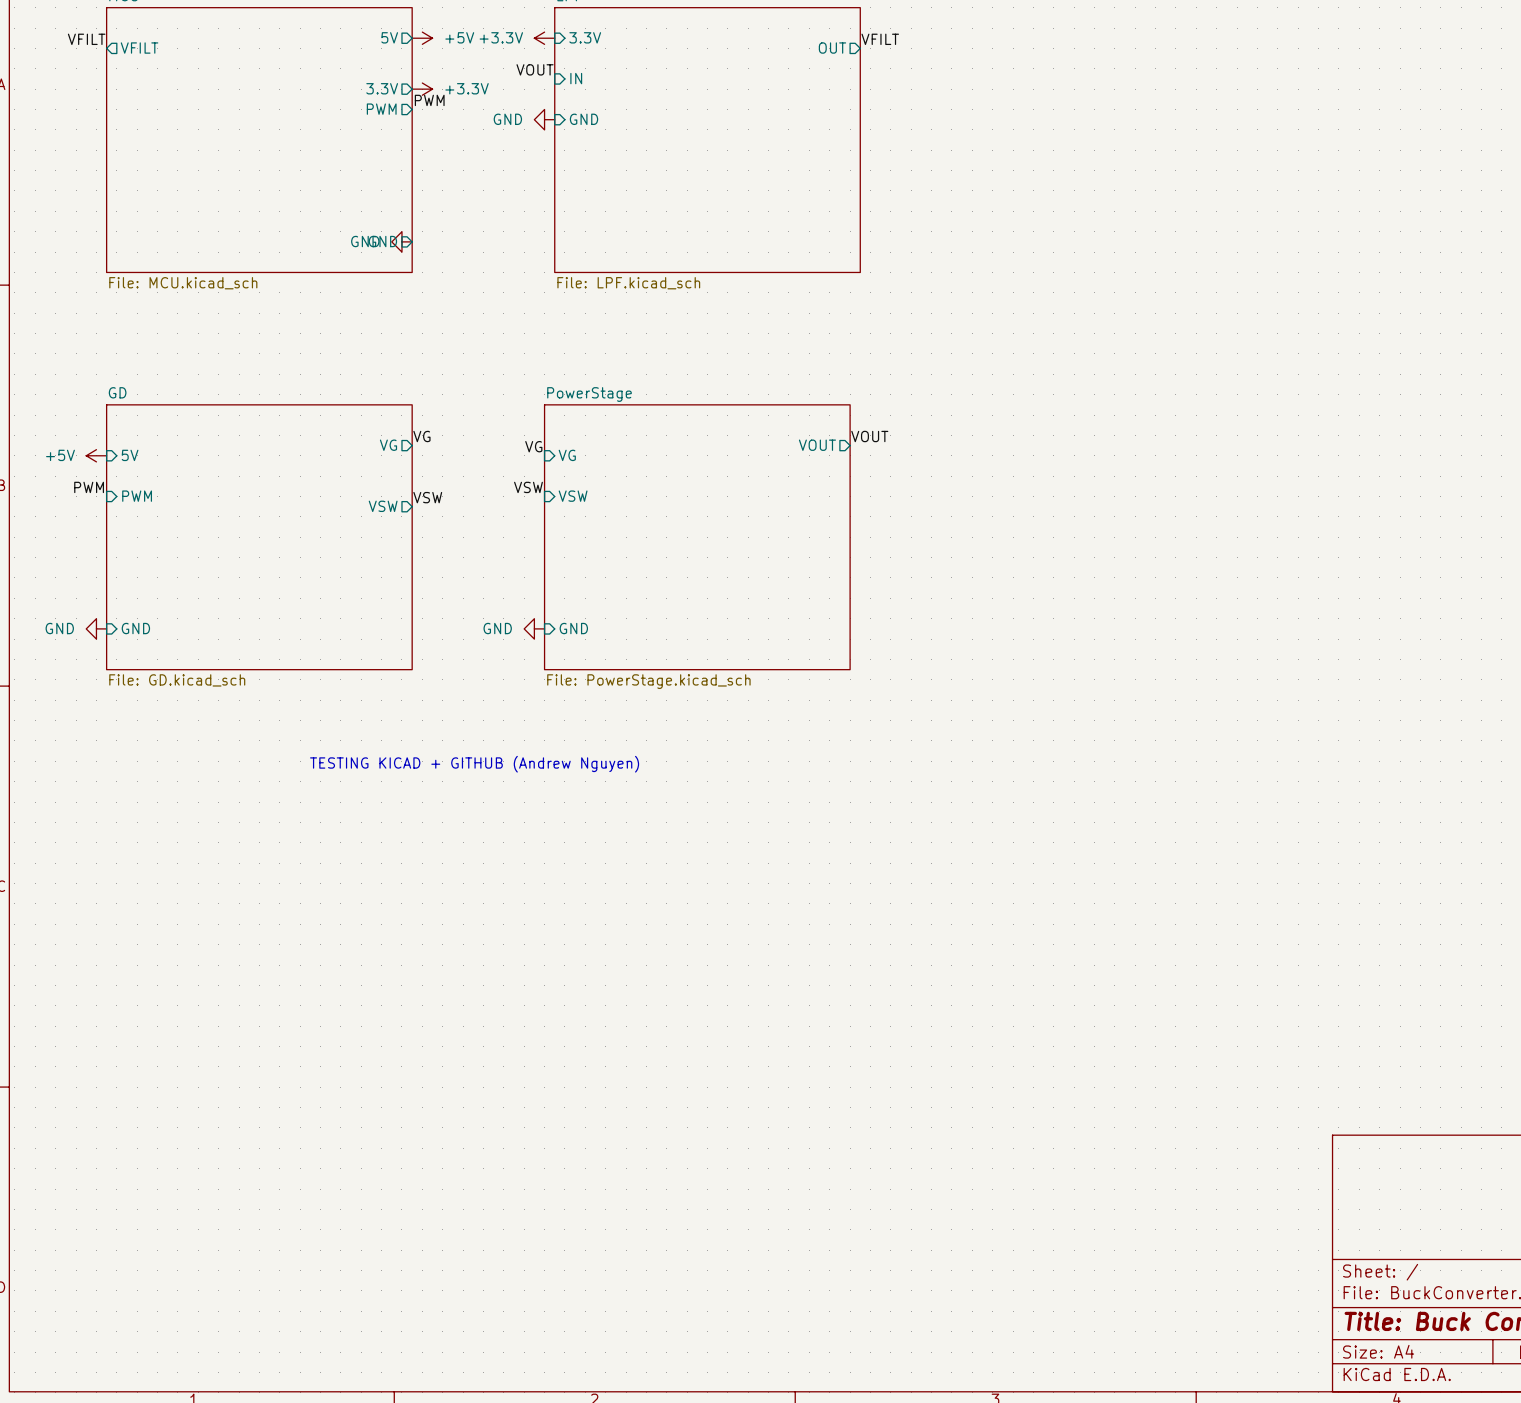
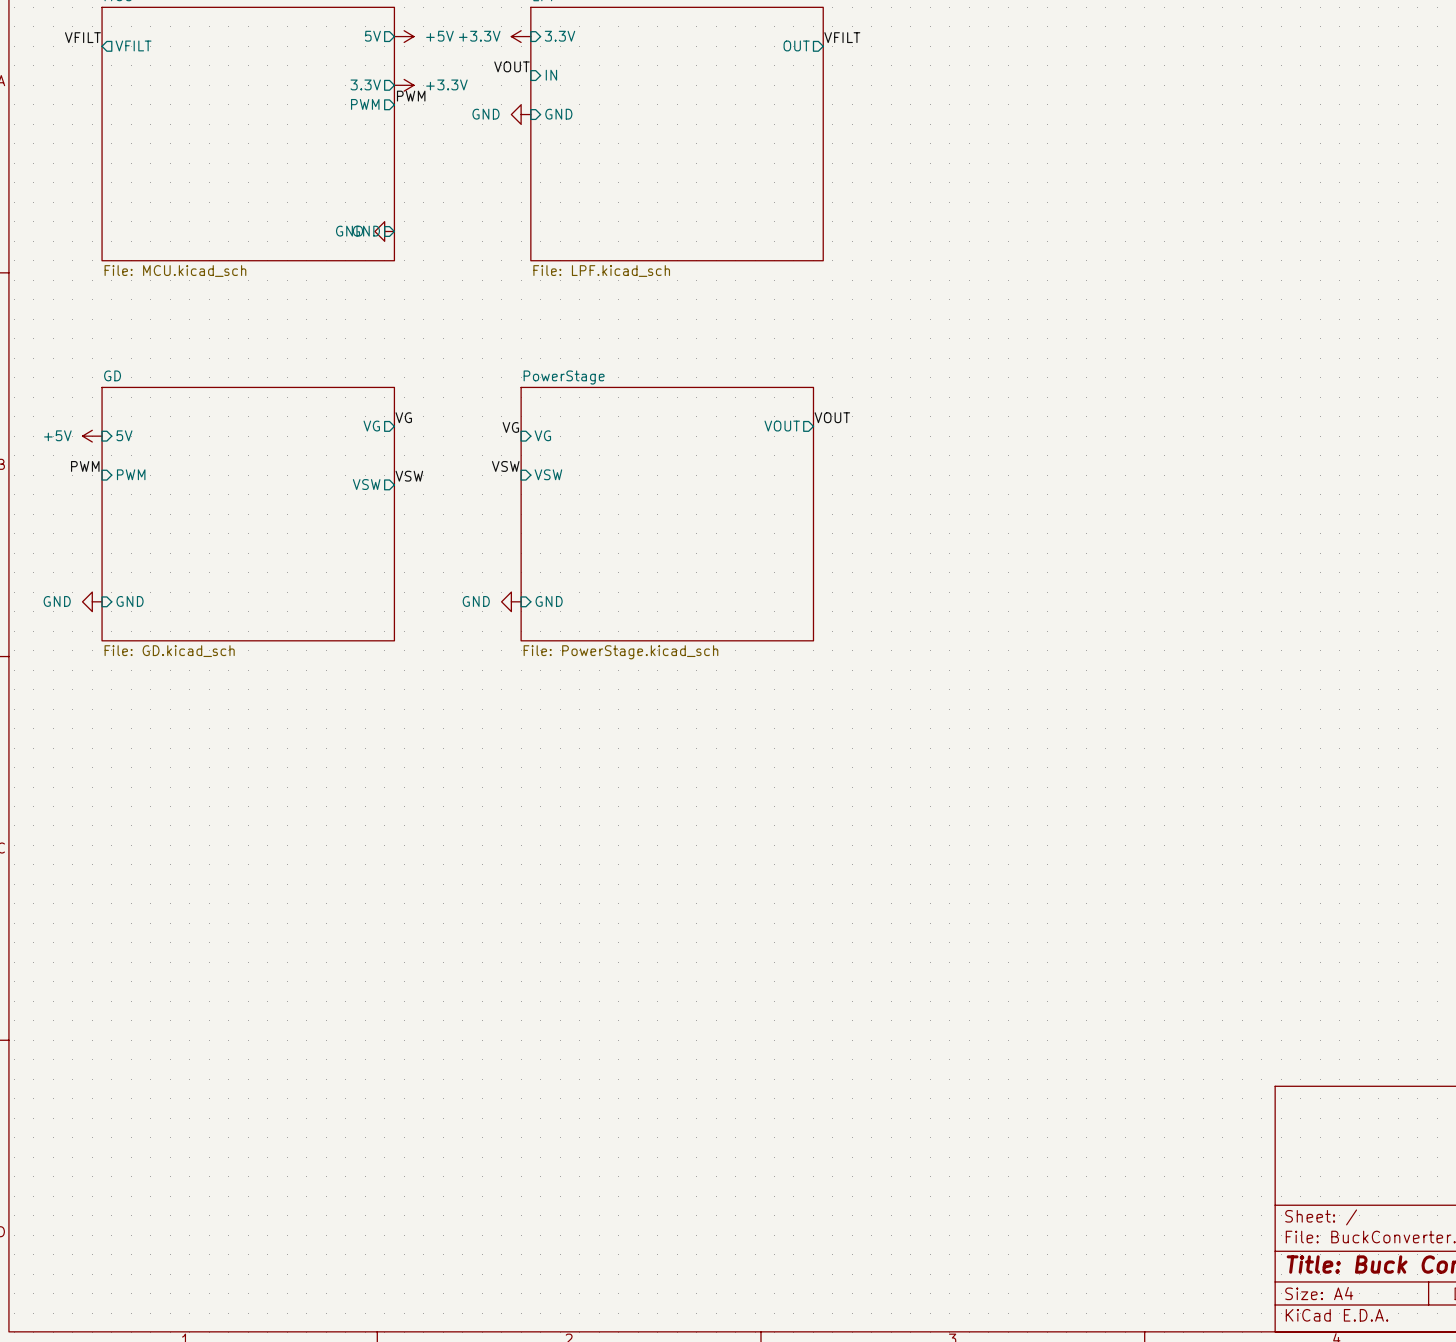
text: TESTING KICAD + GITHUB (Andrew Nguyen) (474, 764) -> none

